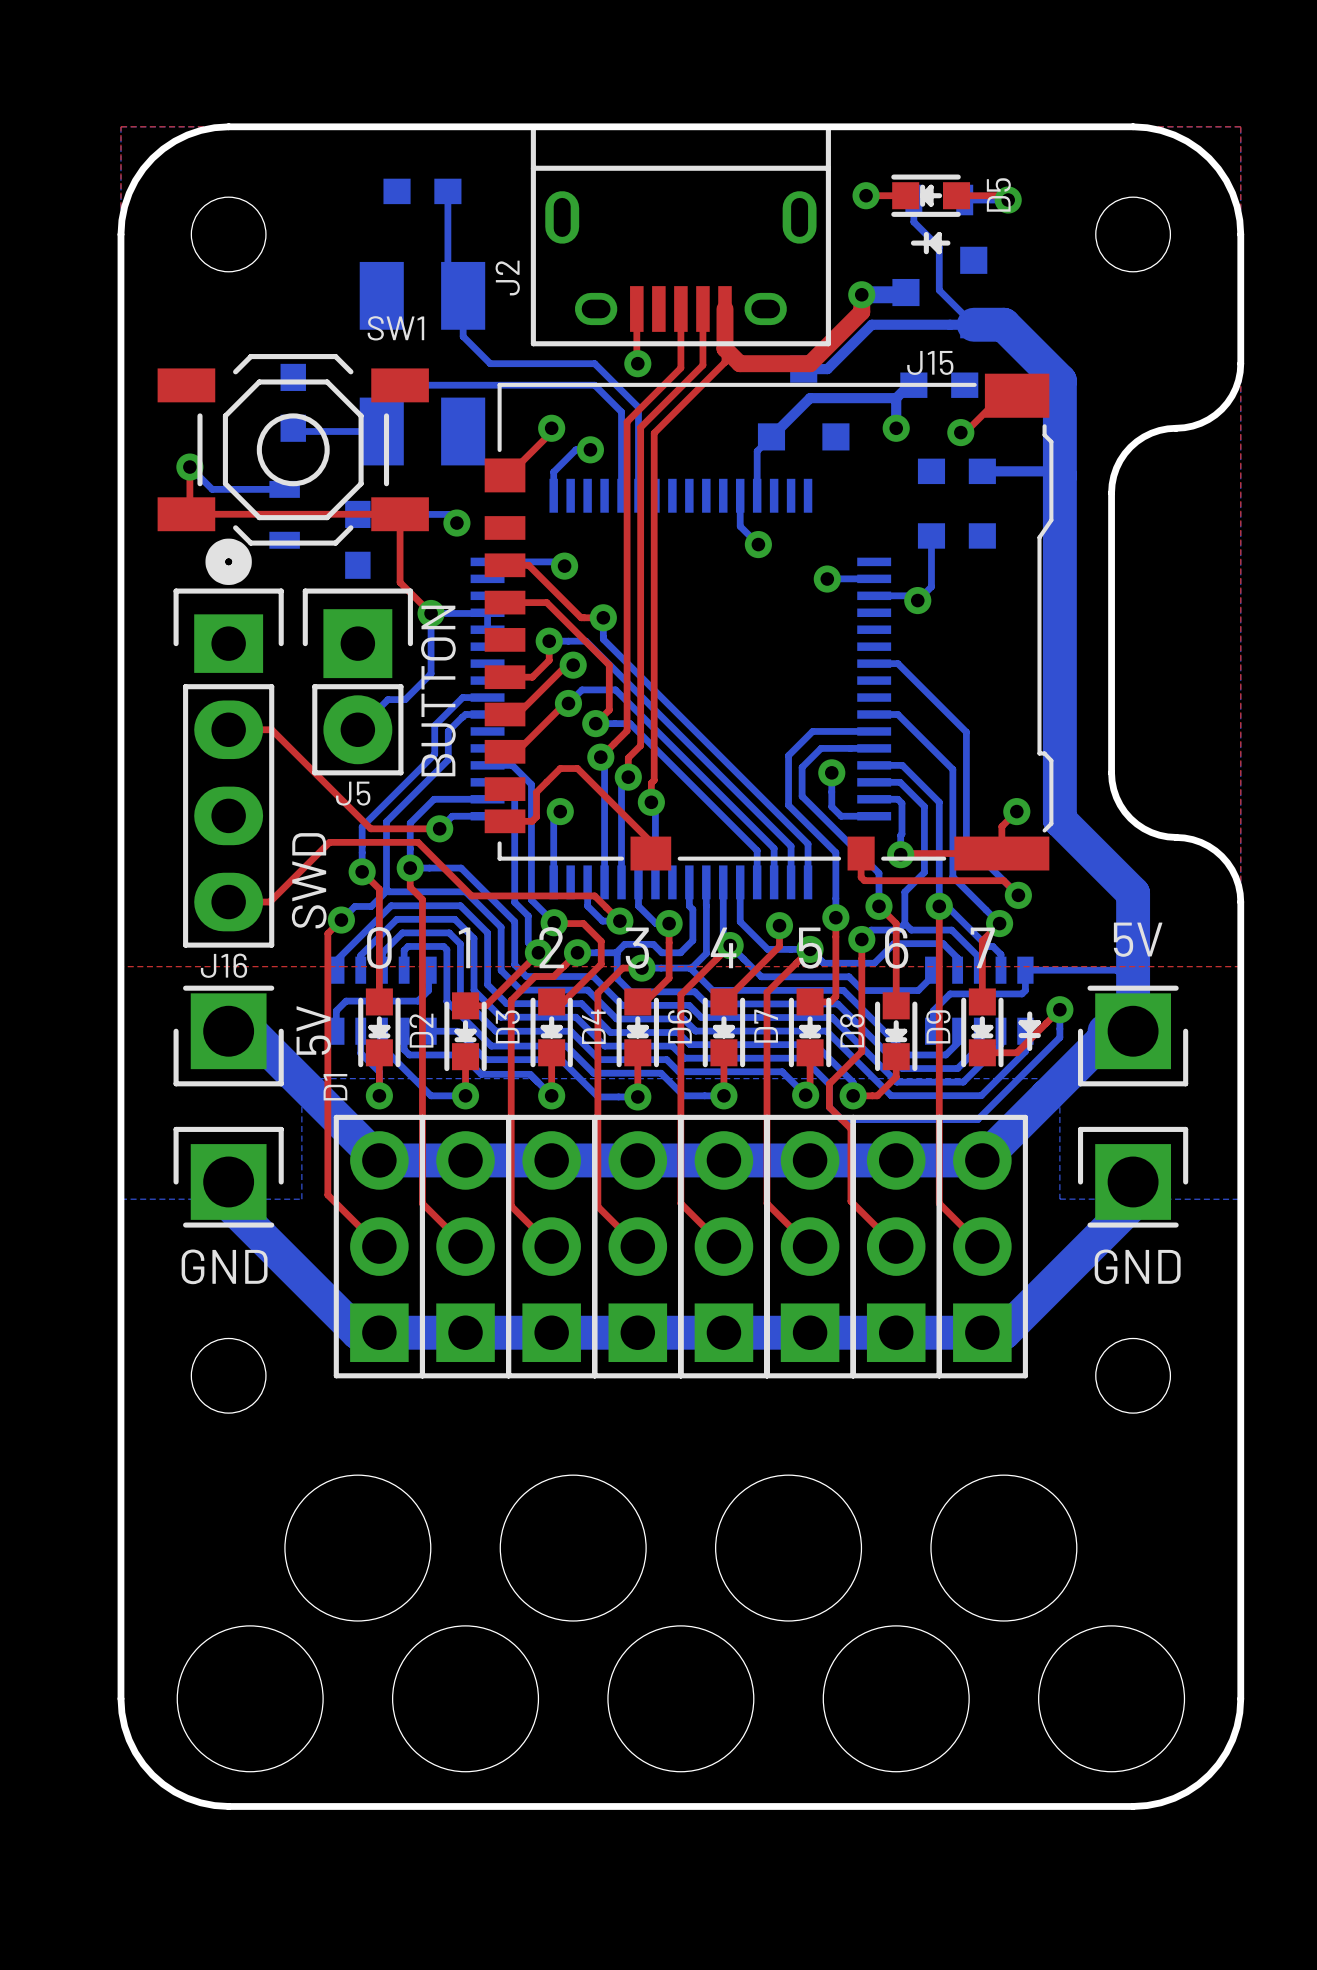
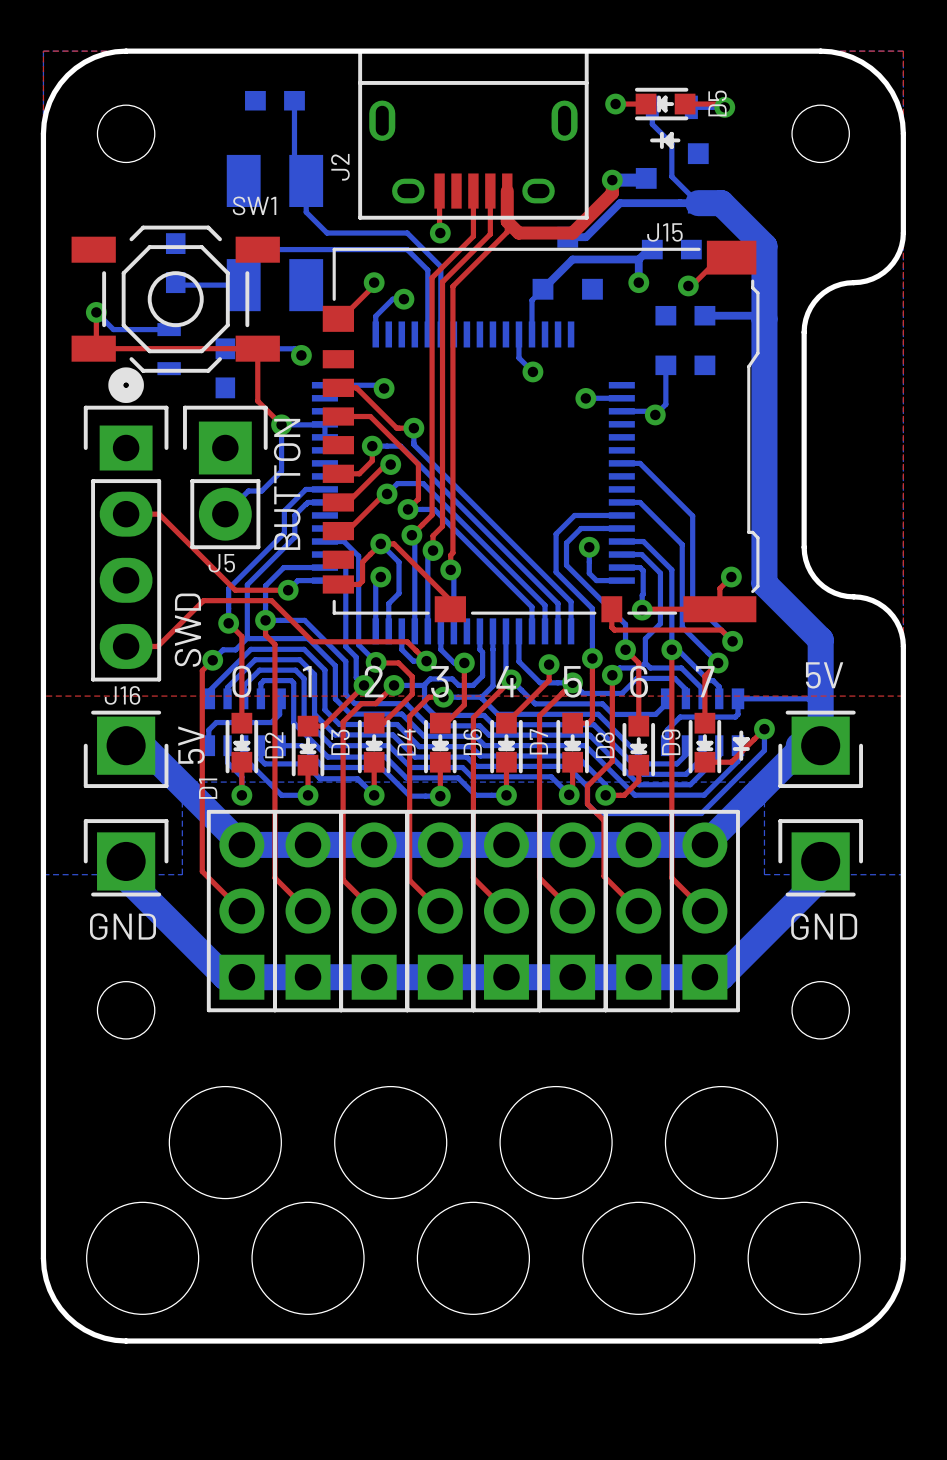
bottom track: none -> (380, 543) (399, 562) (399, 593) (388, 603) (388, 631)
via: none -> (380, 543)

